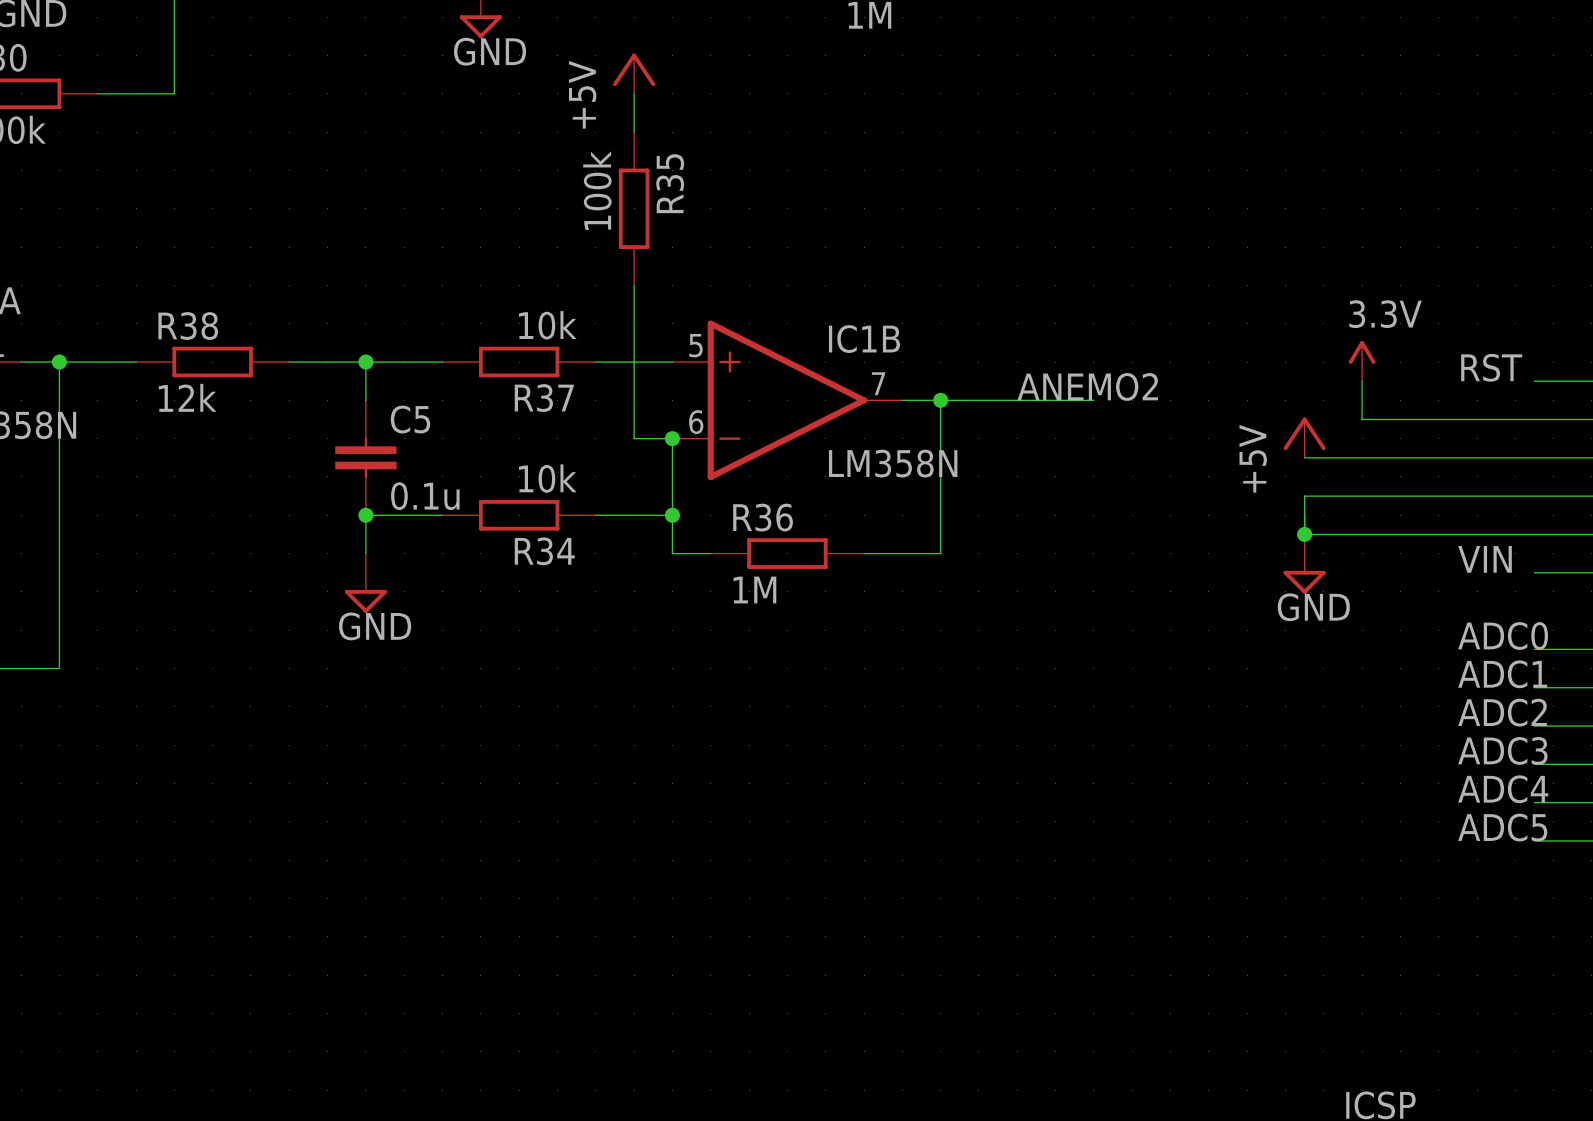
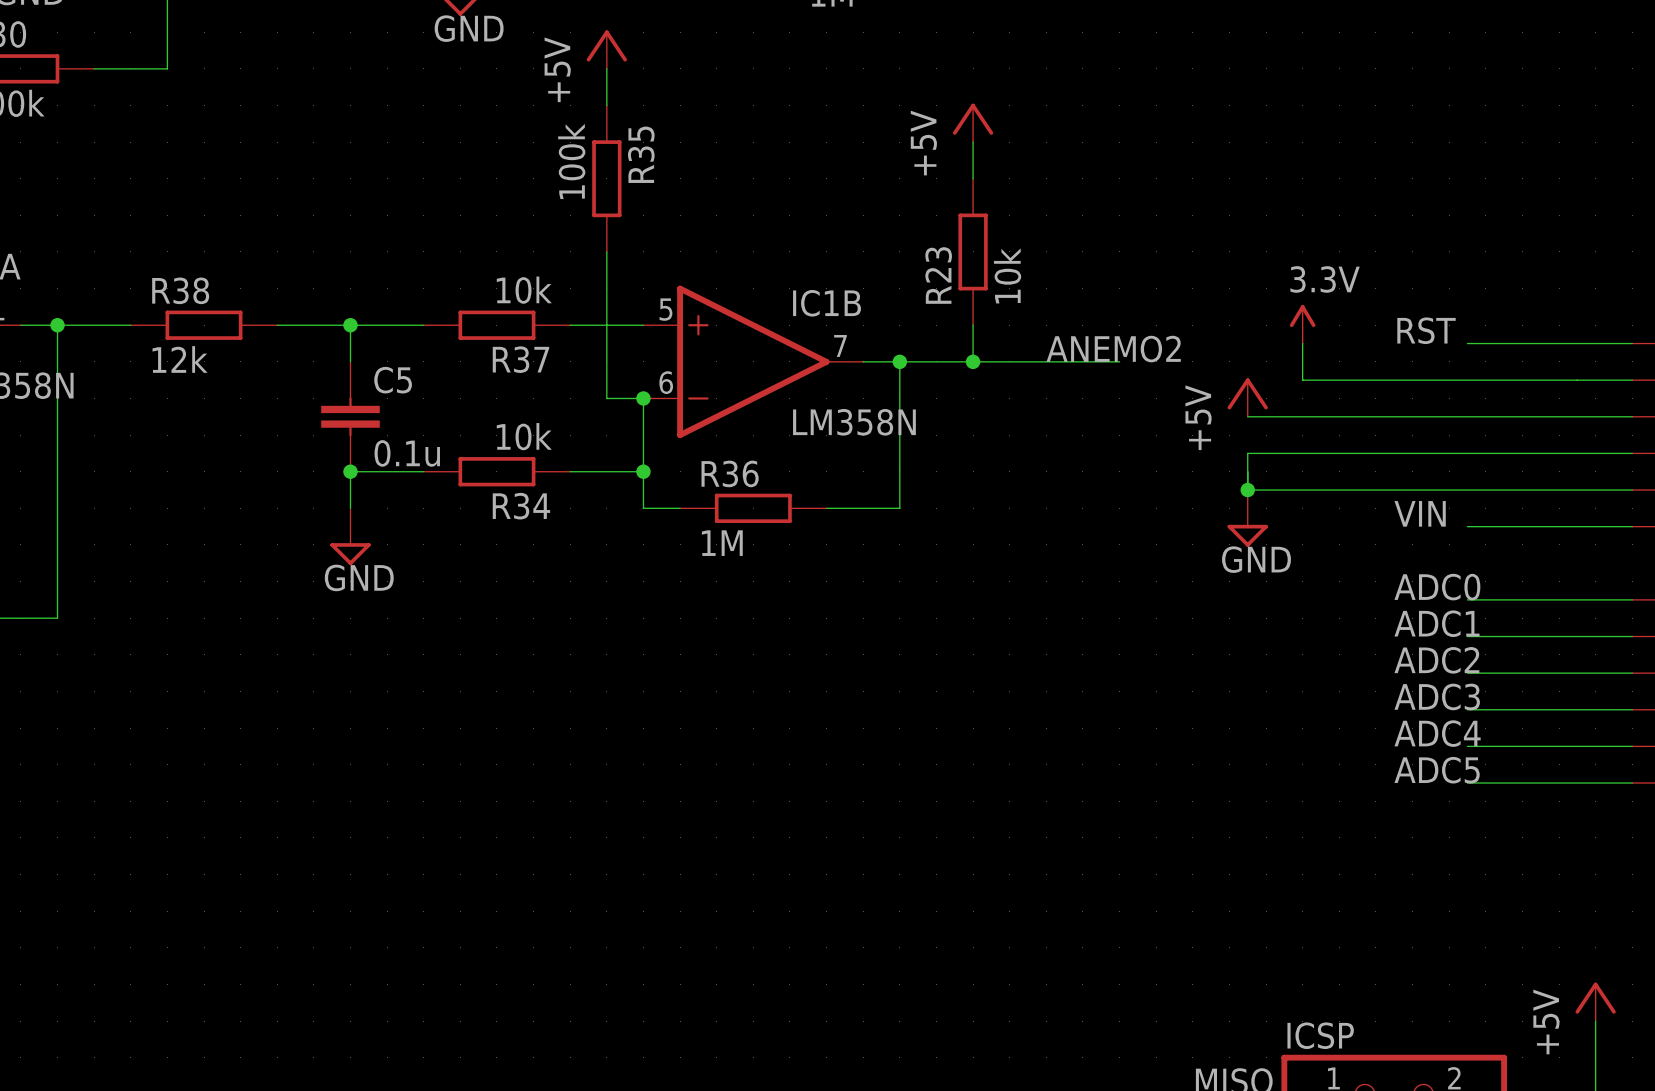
power symbol: none -> +5V (973, 122)
wire: none -> (973, 142) (973, 178)
R23: none -> 10k (973, 251)
wire: none -> (973, 325) (973, 361)
label position: ANEMO2 (1087, 386) -> ANEMO2 (1113, 349)
junction: none -> (973, 361)
wire: none -> (1046, 361) (1119, 361)

